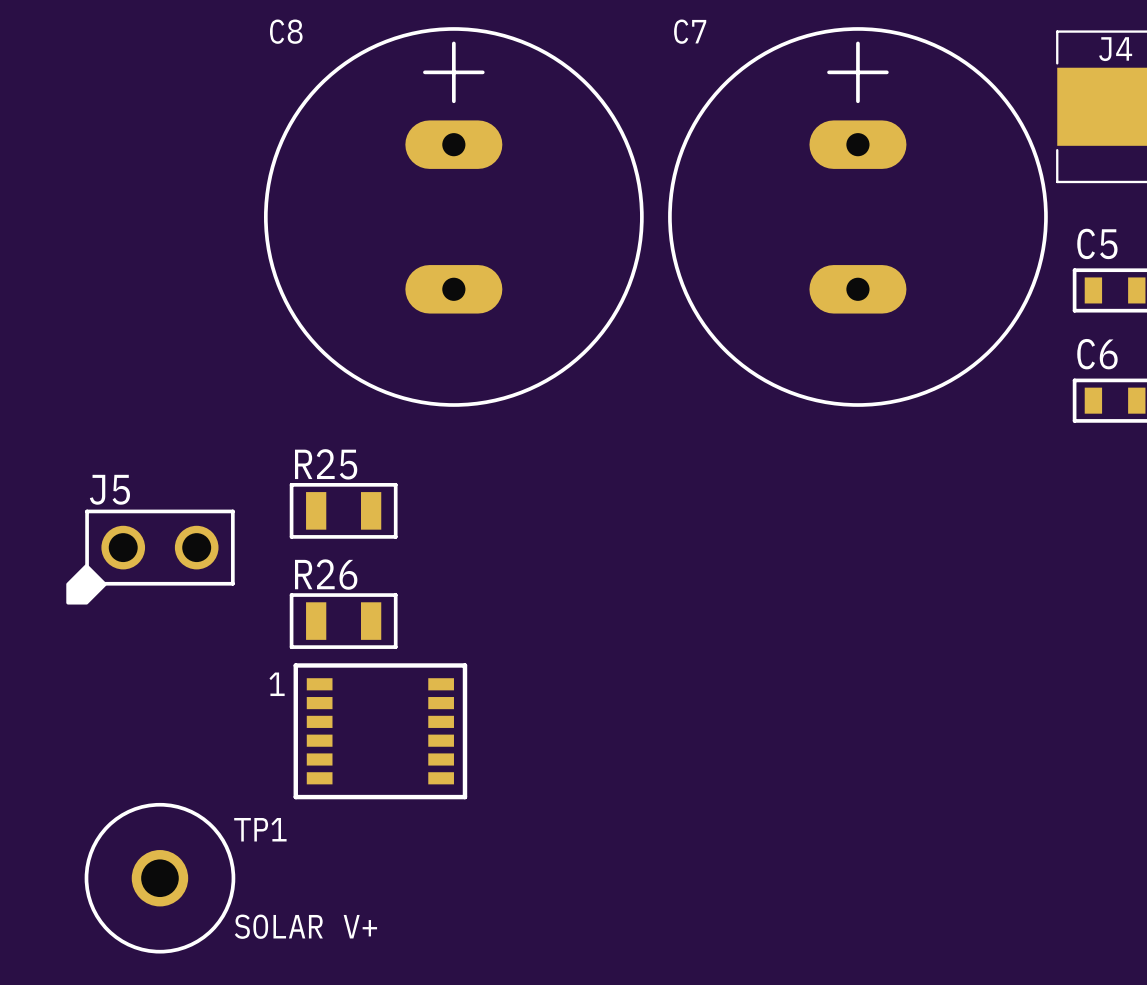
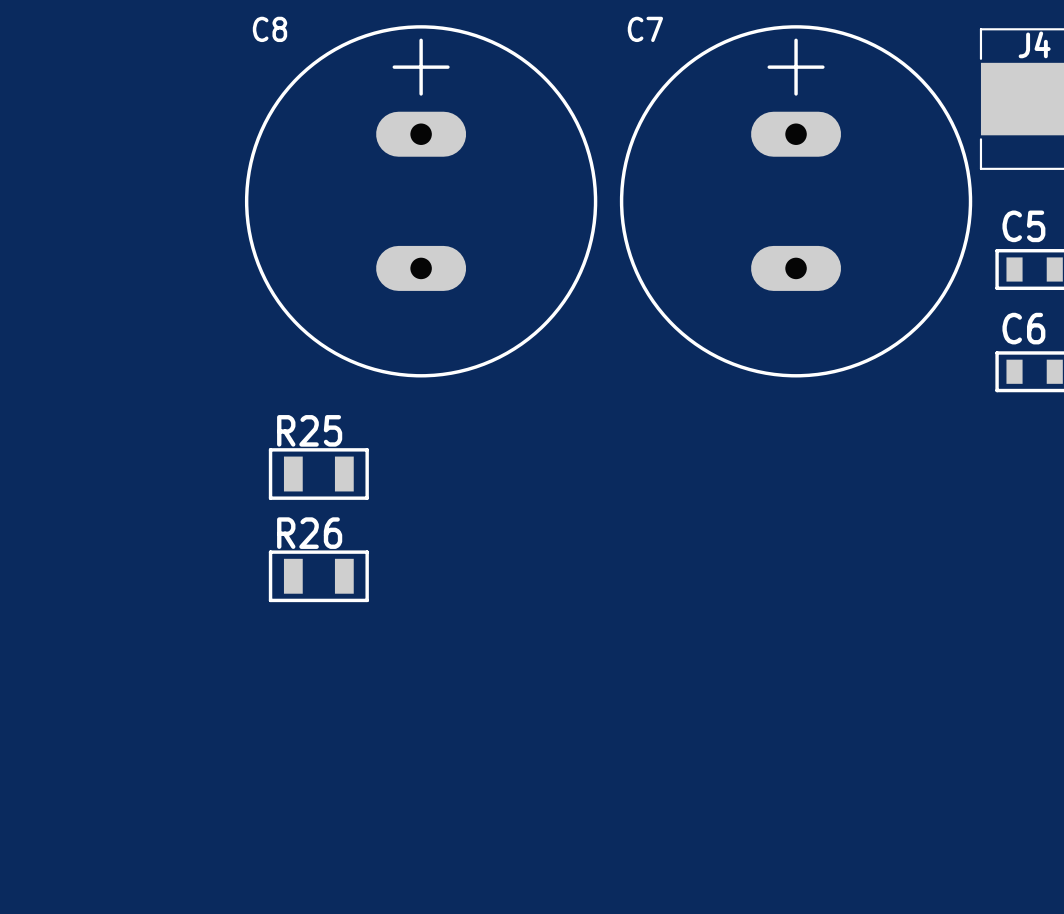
J5: (150, 557) -> none
part: (380, 731) -> none
TP1: (159, 878) -> none

